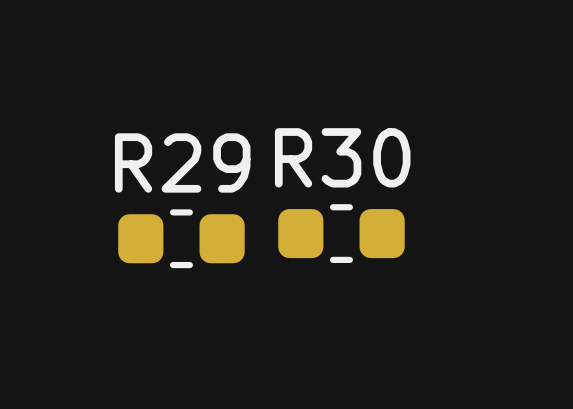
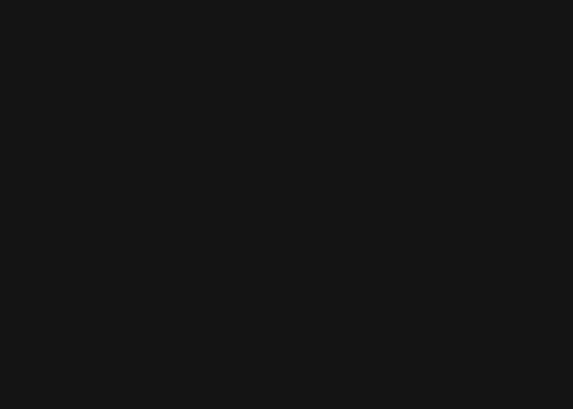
R30: (341, 233) -> none
R29: (181, 238) -> none

